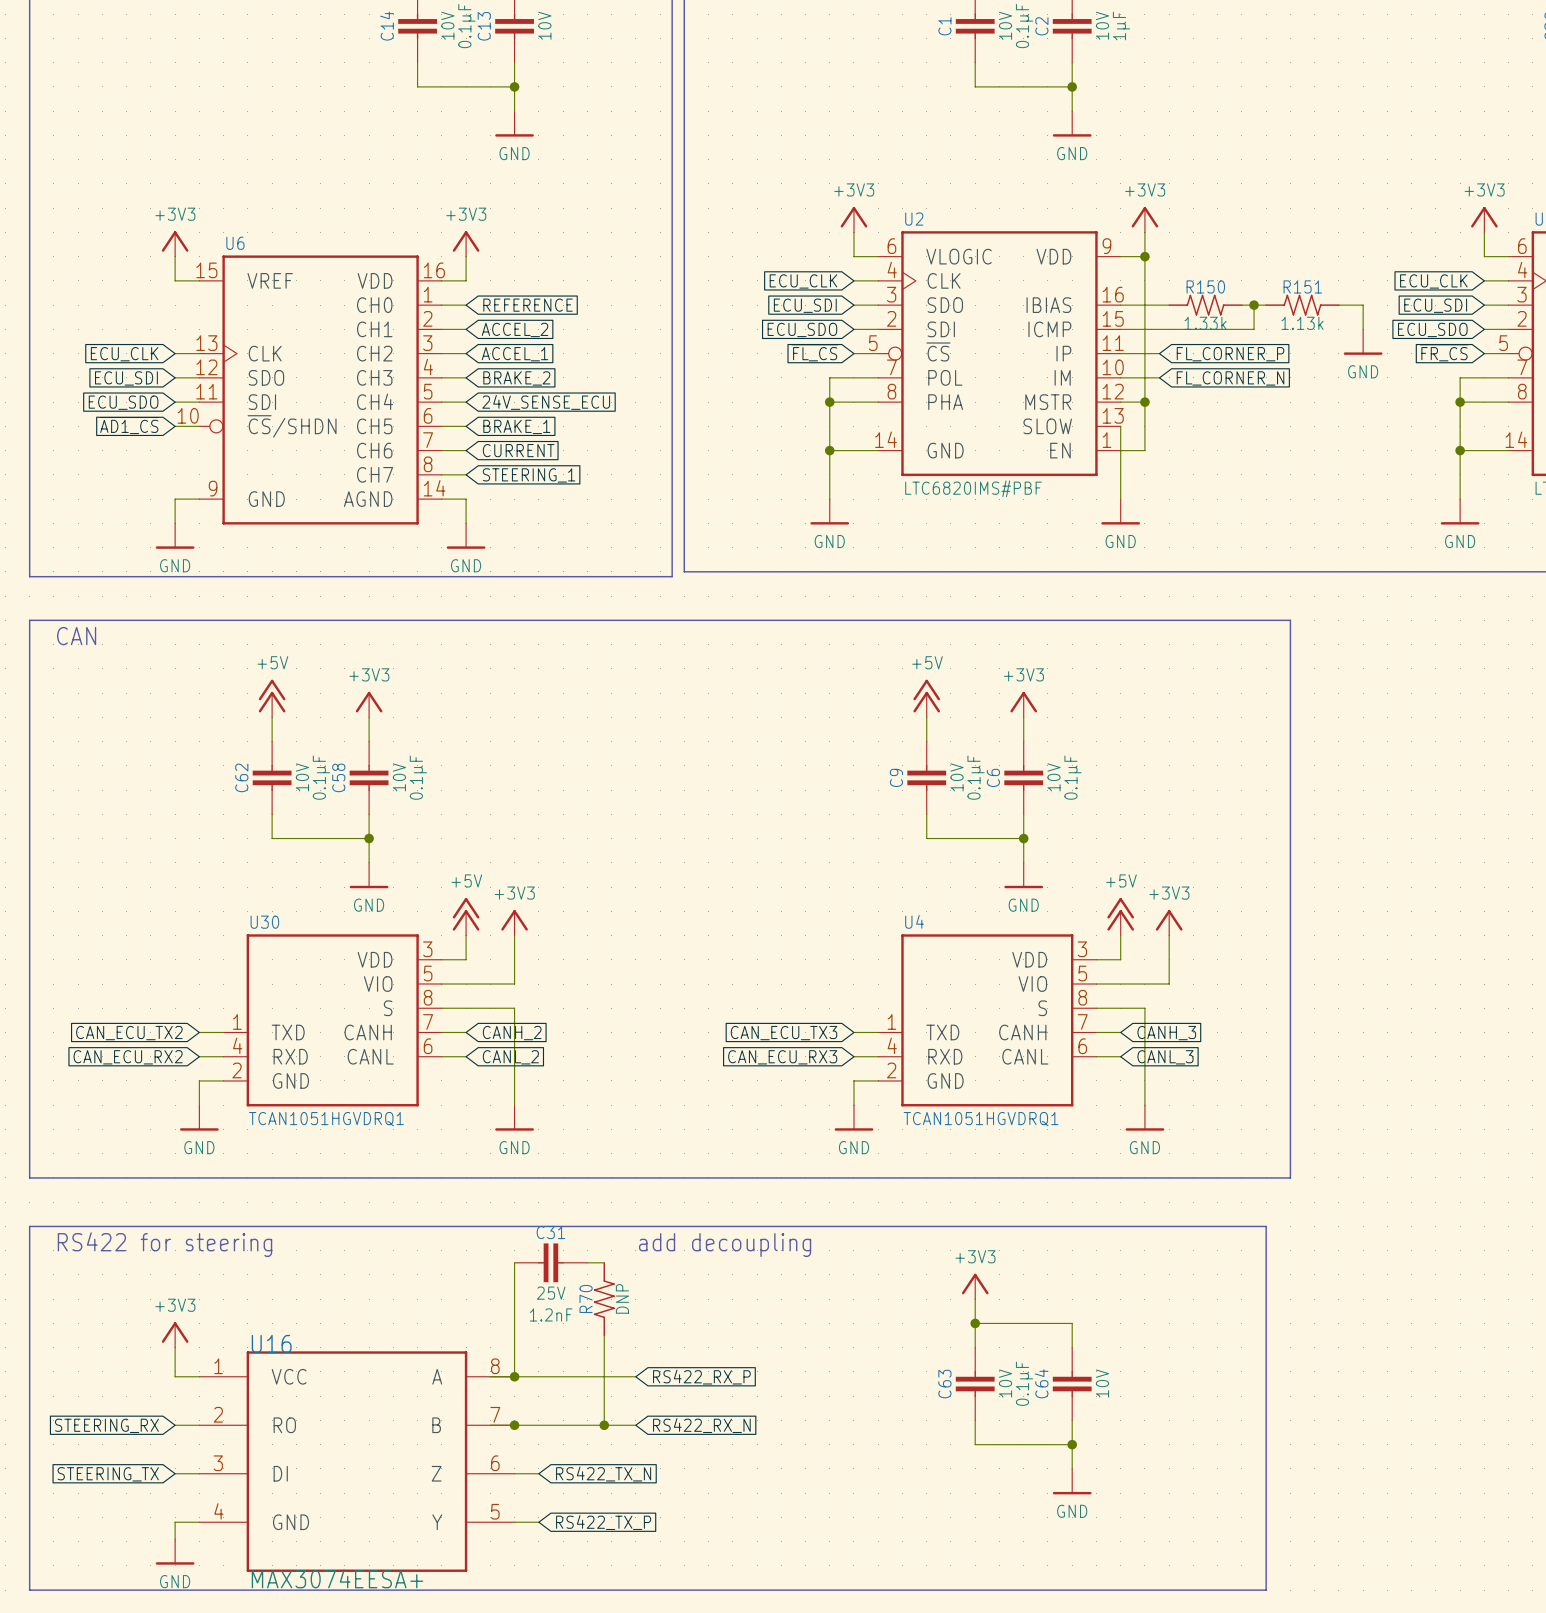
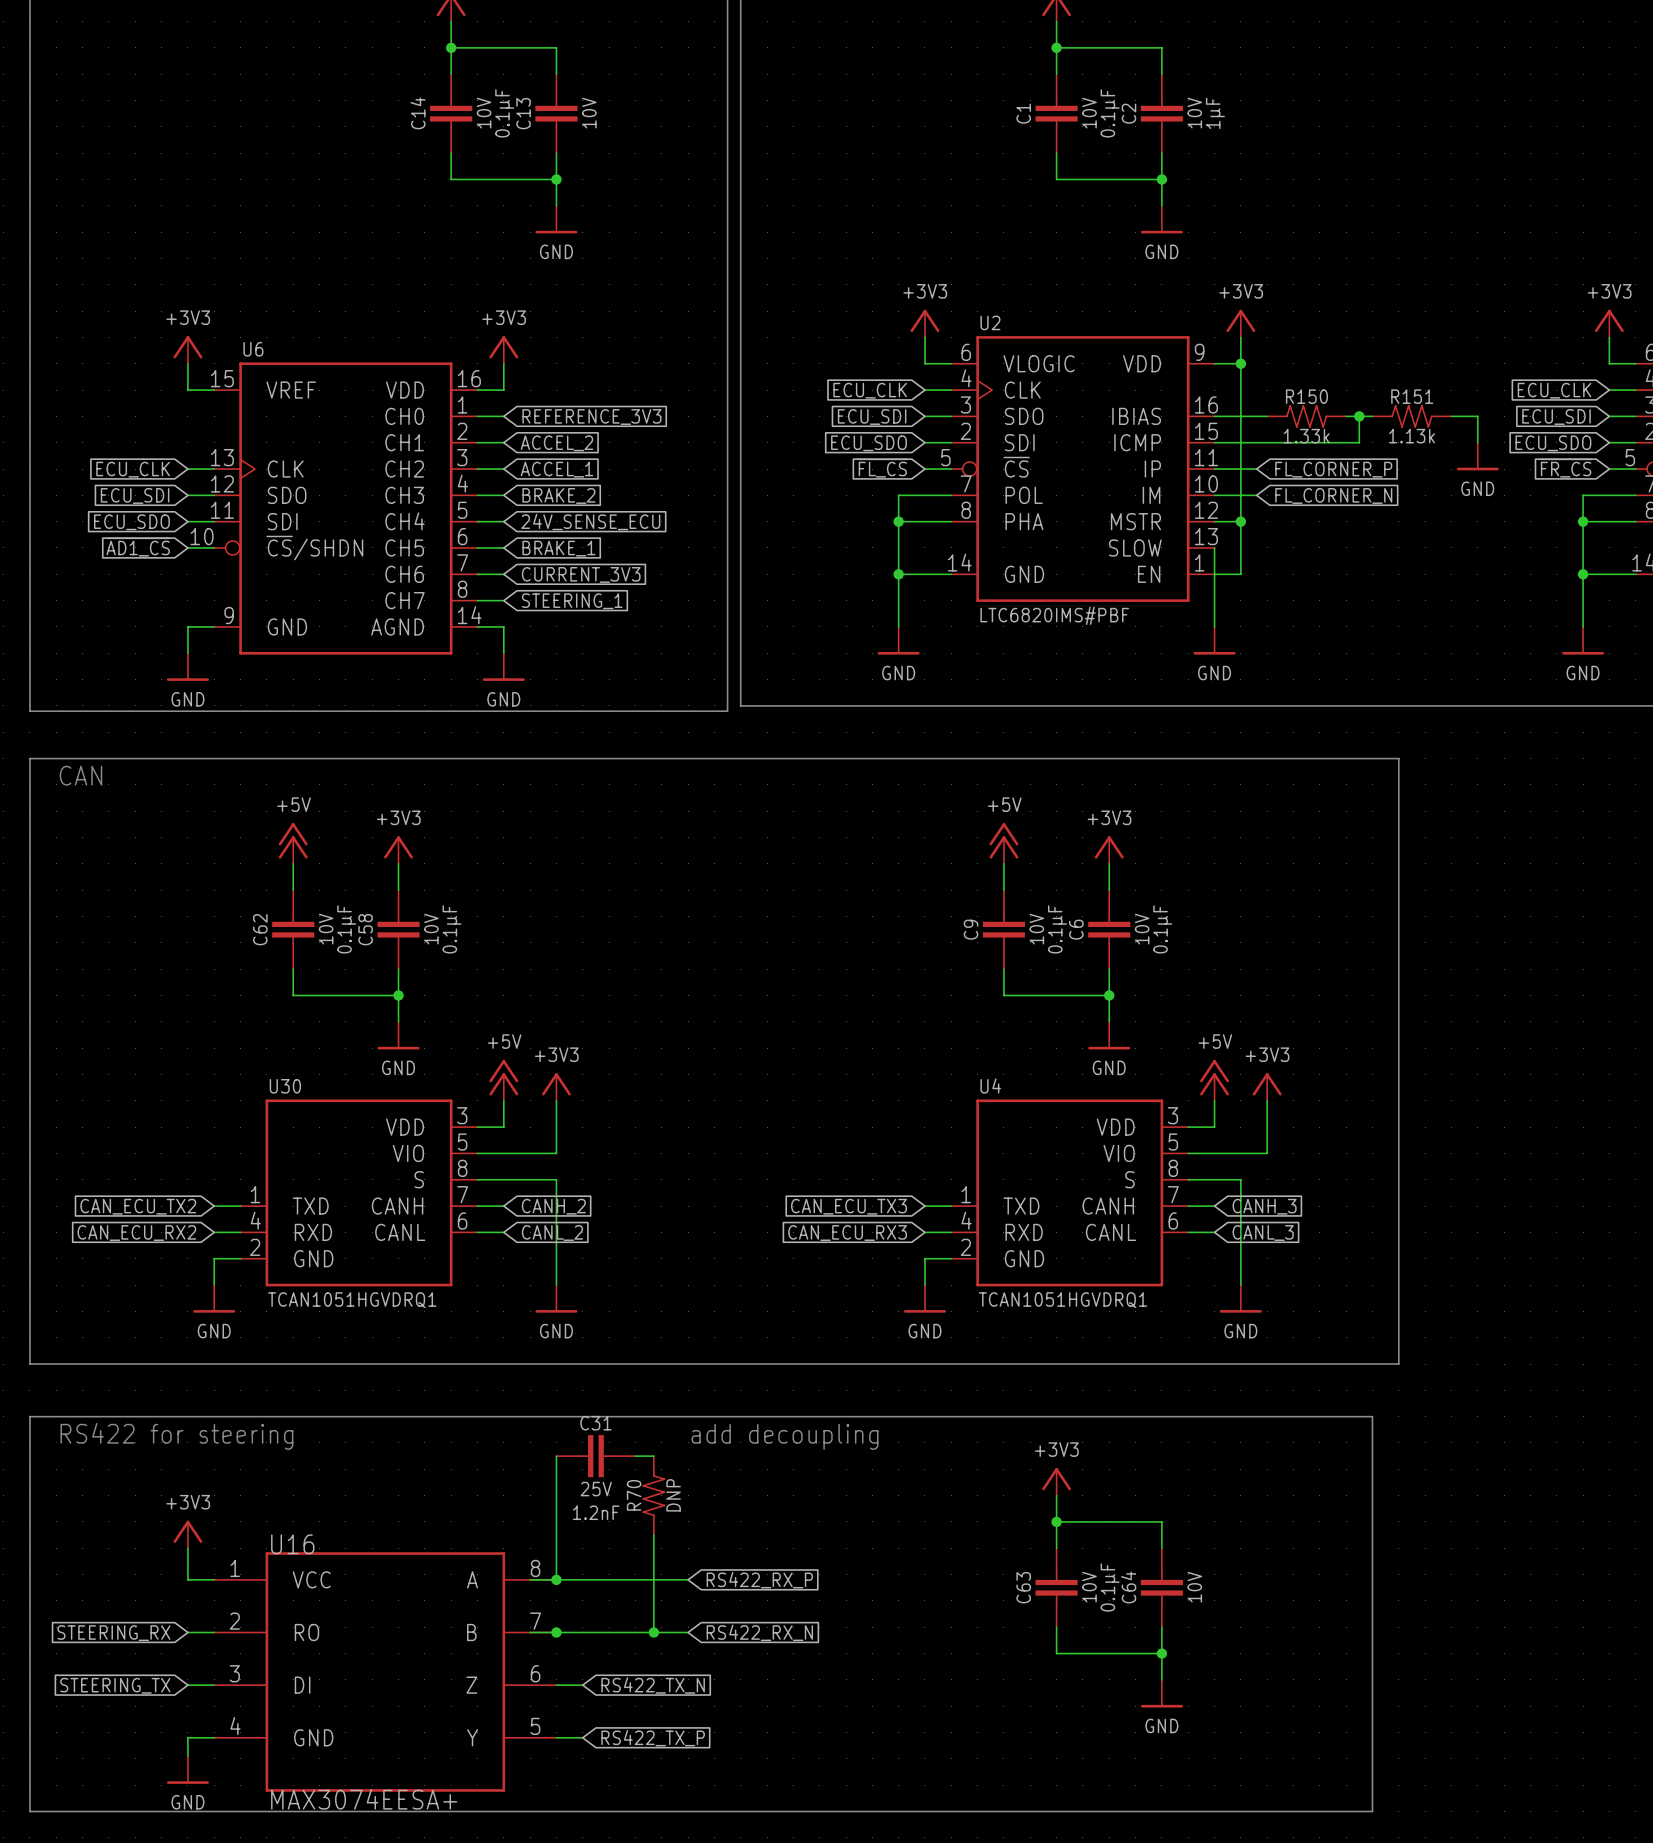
global label: REFERENCE (528, 305) -> REFERENCE_3V3 (591, 417)
global label: CURRENT (518, 450) -> CURRENT_3V3 (581, 574)

